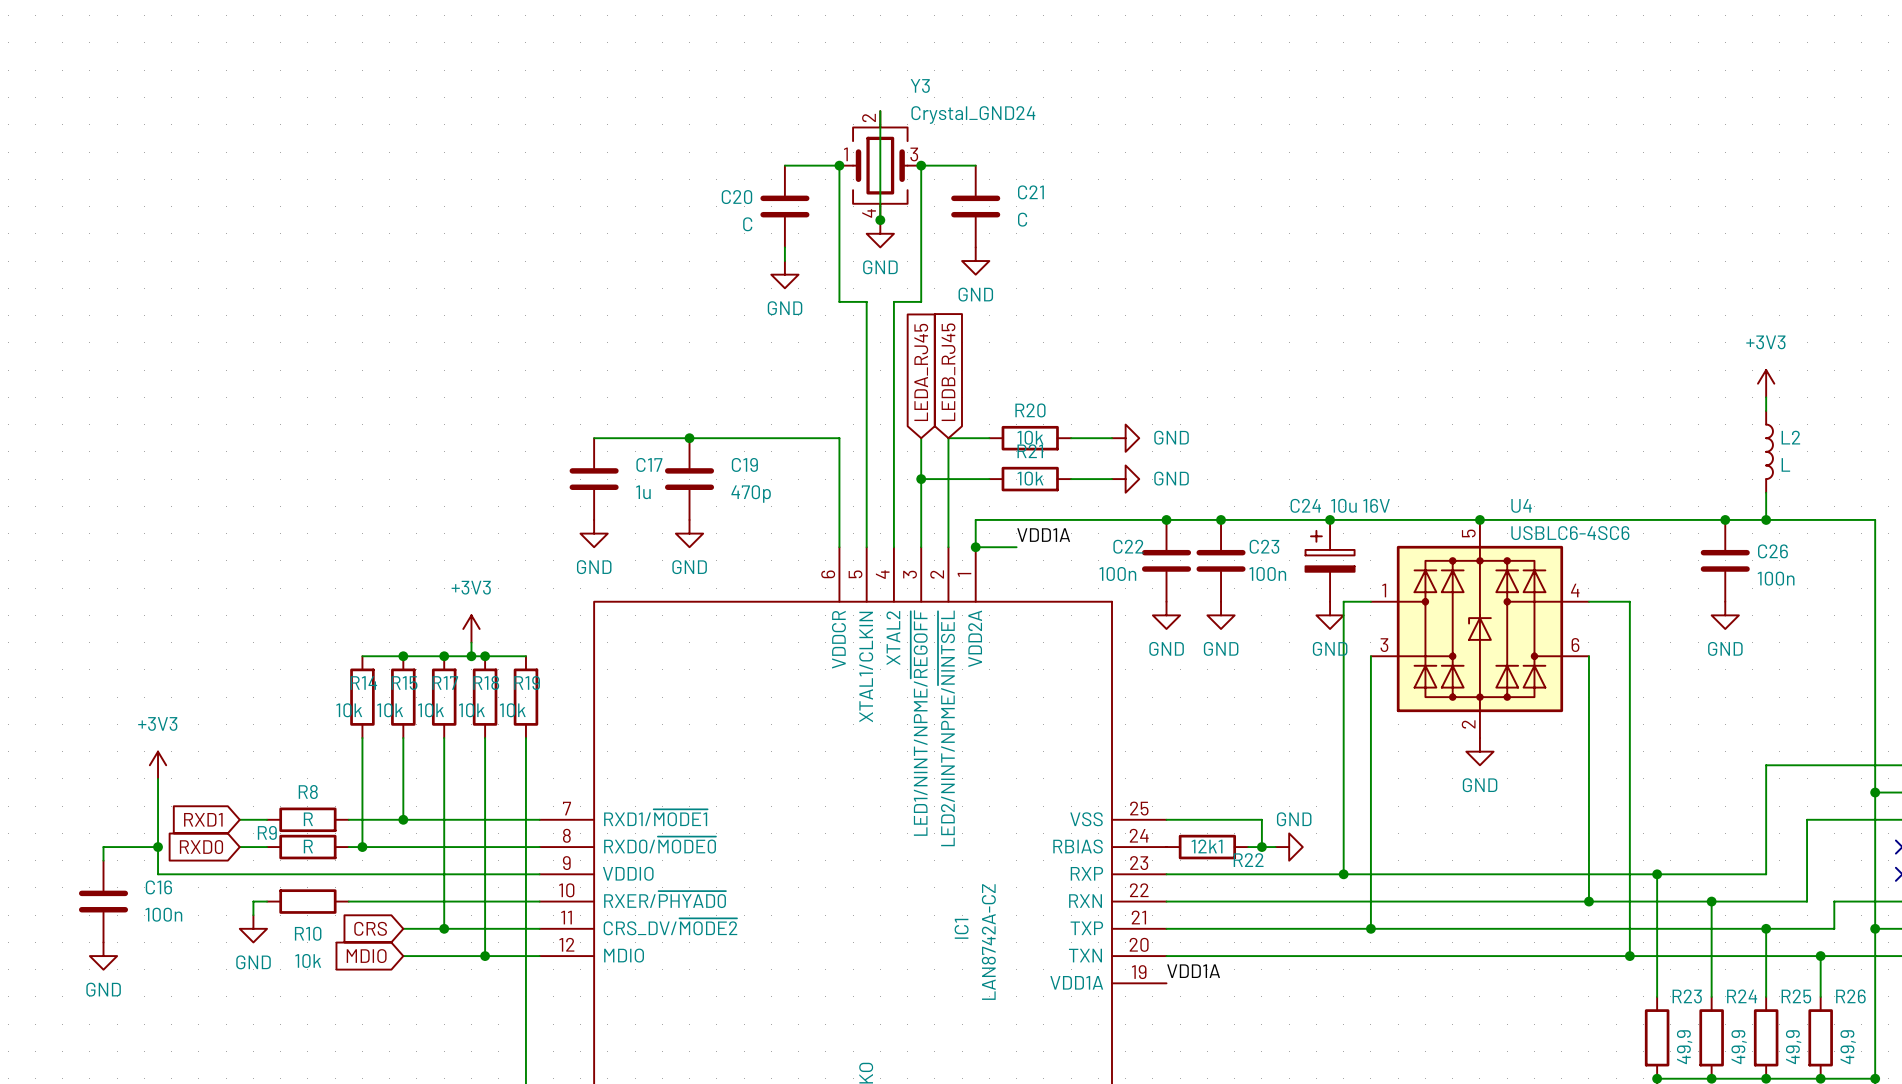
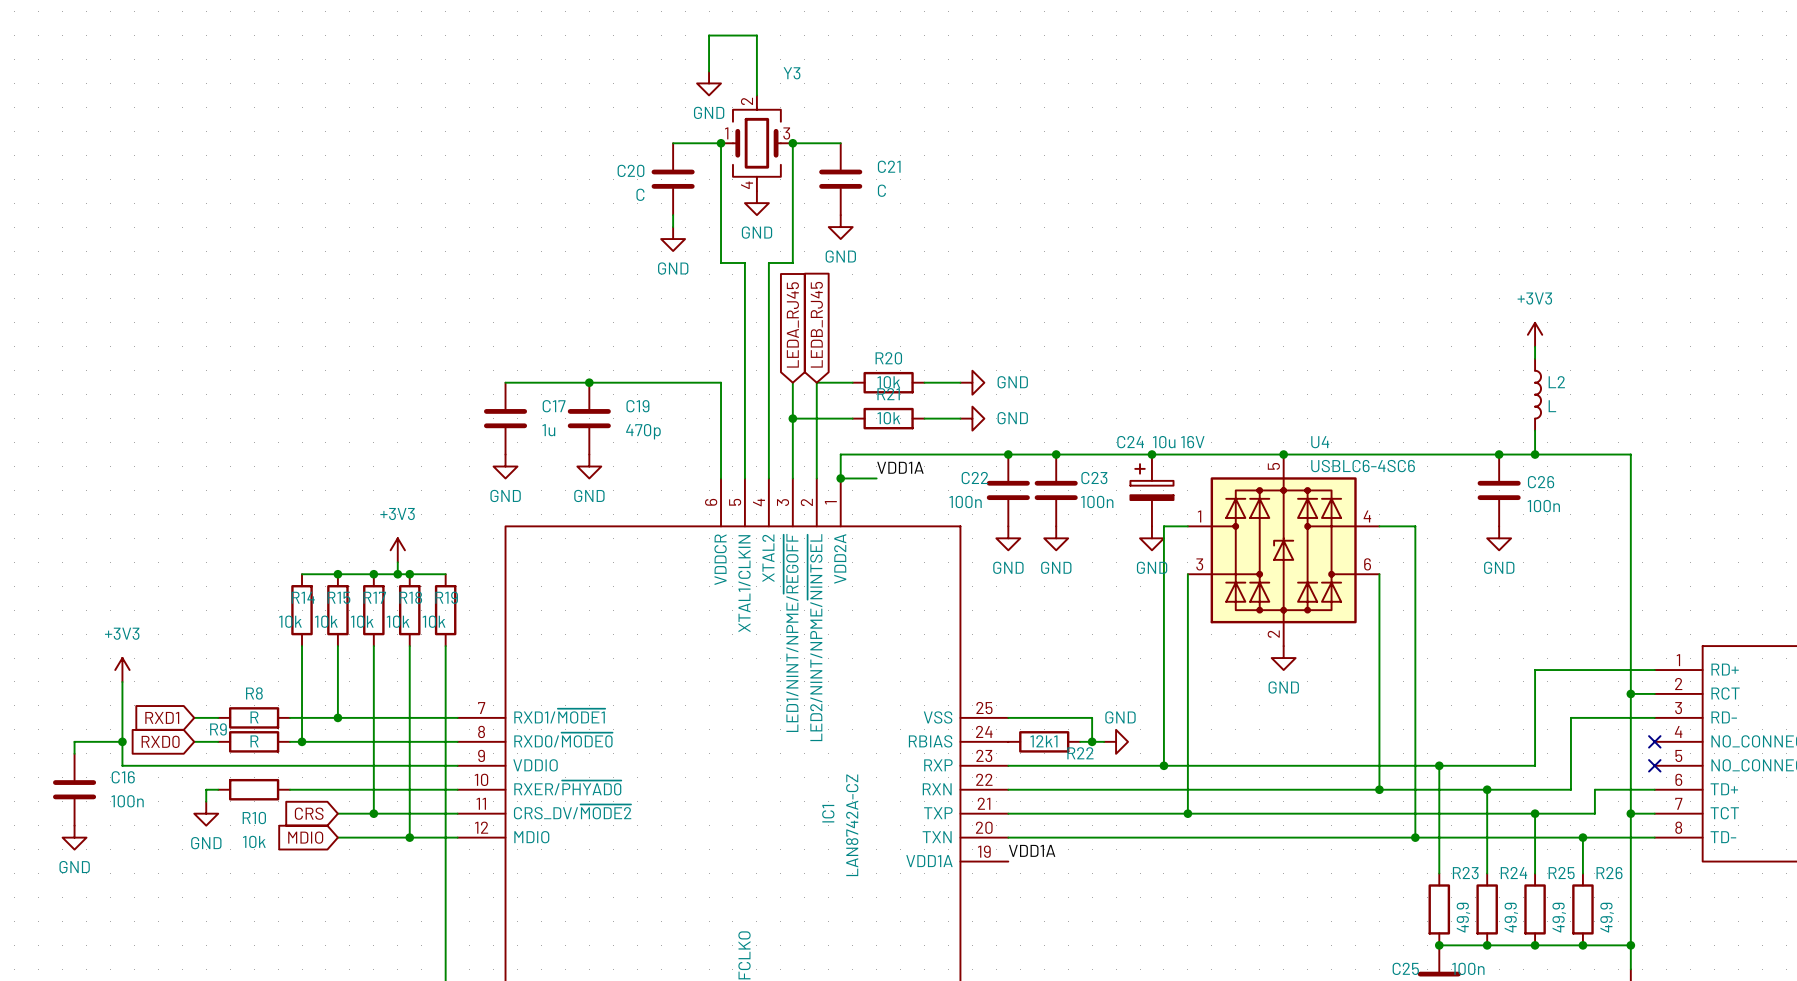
power symbol: none -> GND (709, 83)
wire: (880, 111) (880, 220) -> (756, 95) (756, 35) (709, 35) (709, 71)
Y3 value: Crystal_GND24 (973, 114) -> none
junction: (880, 220) -> none

